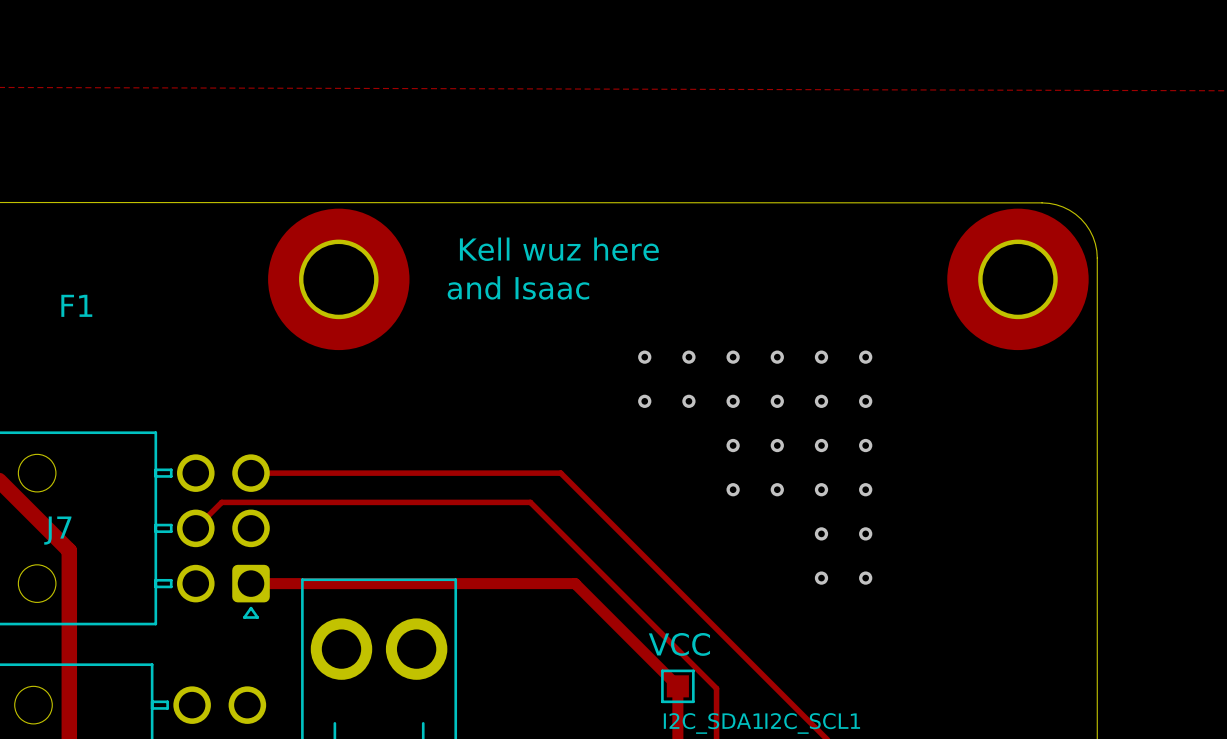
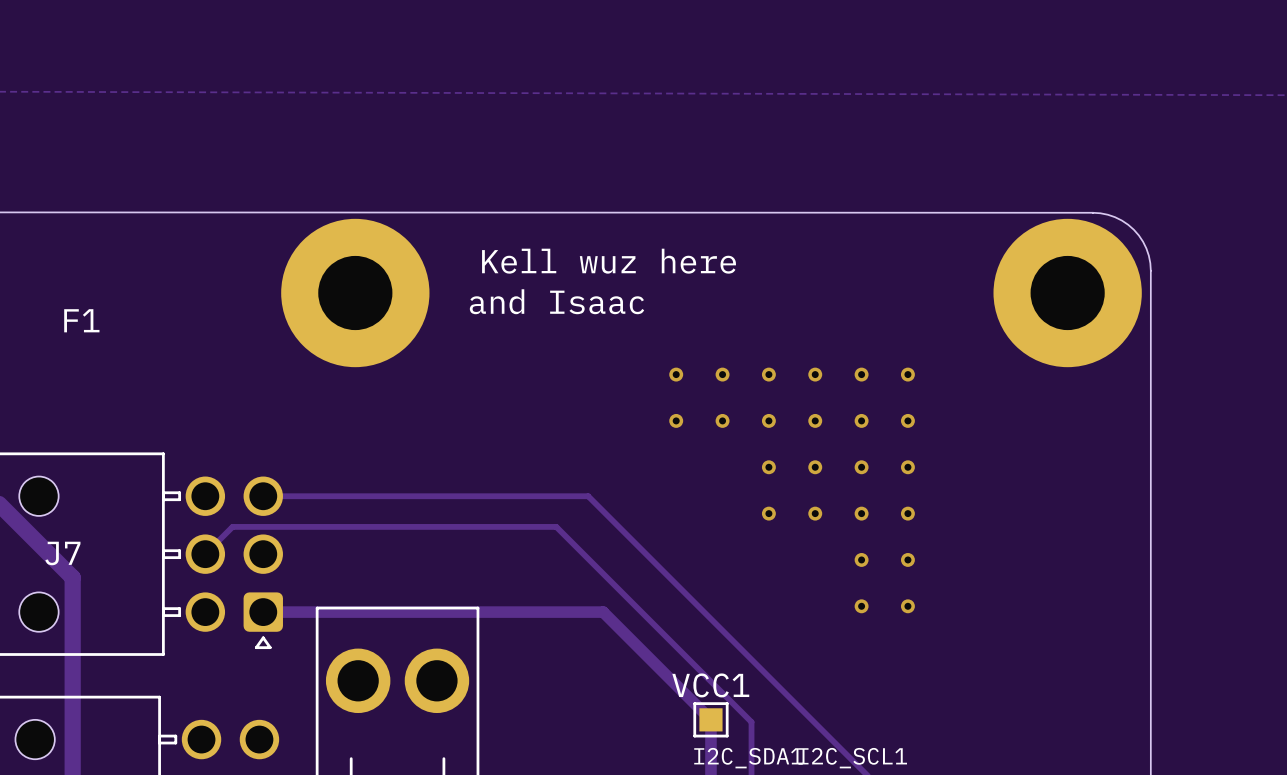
text: VCC (679, 644) -> none
VCC1 name: none -> VCC1 (710, 685)

